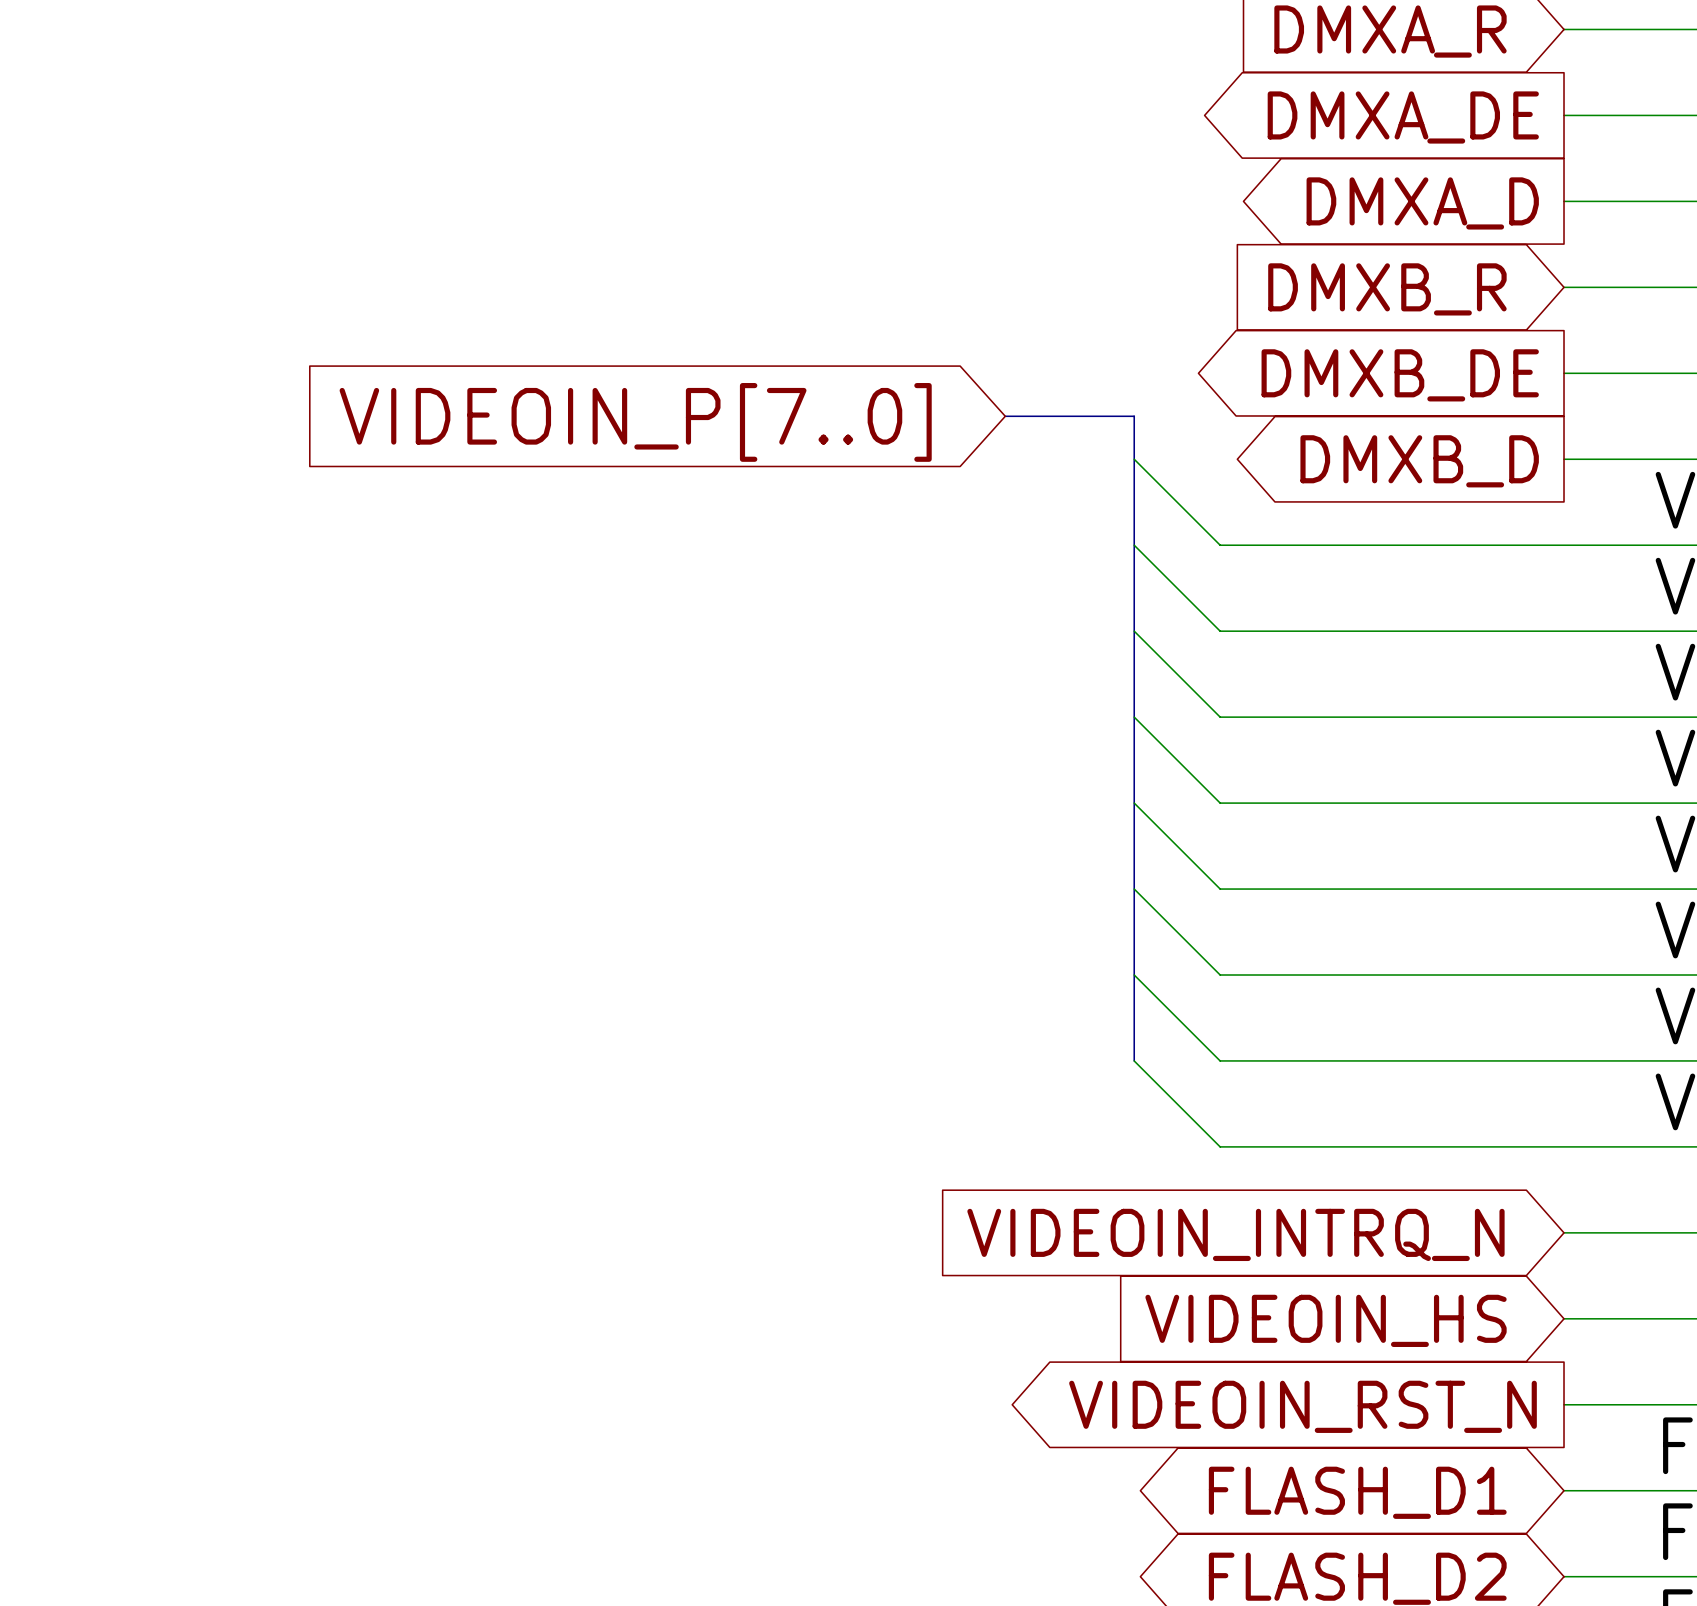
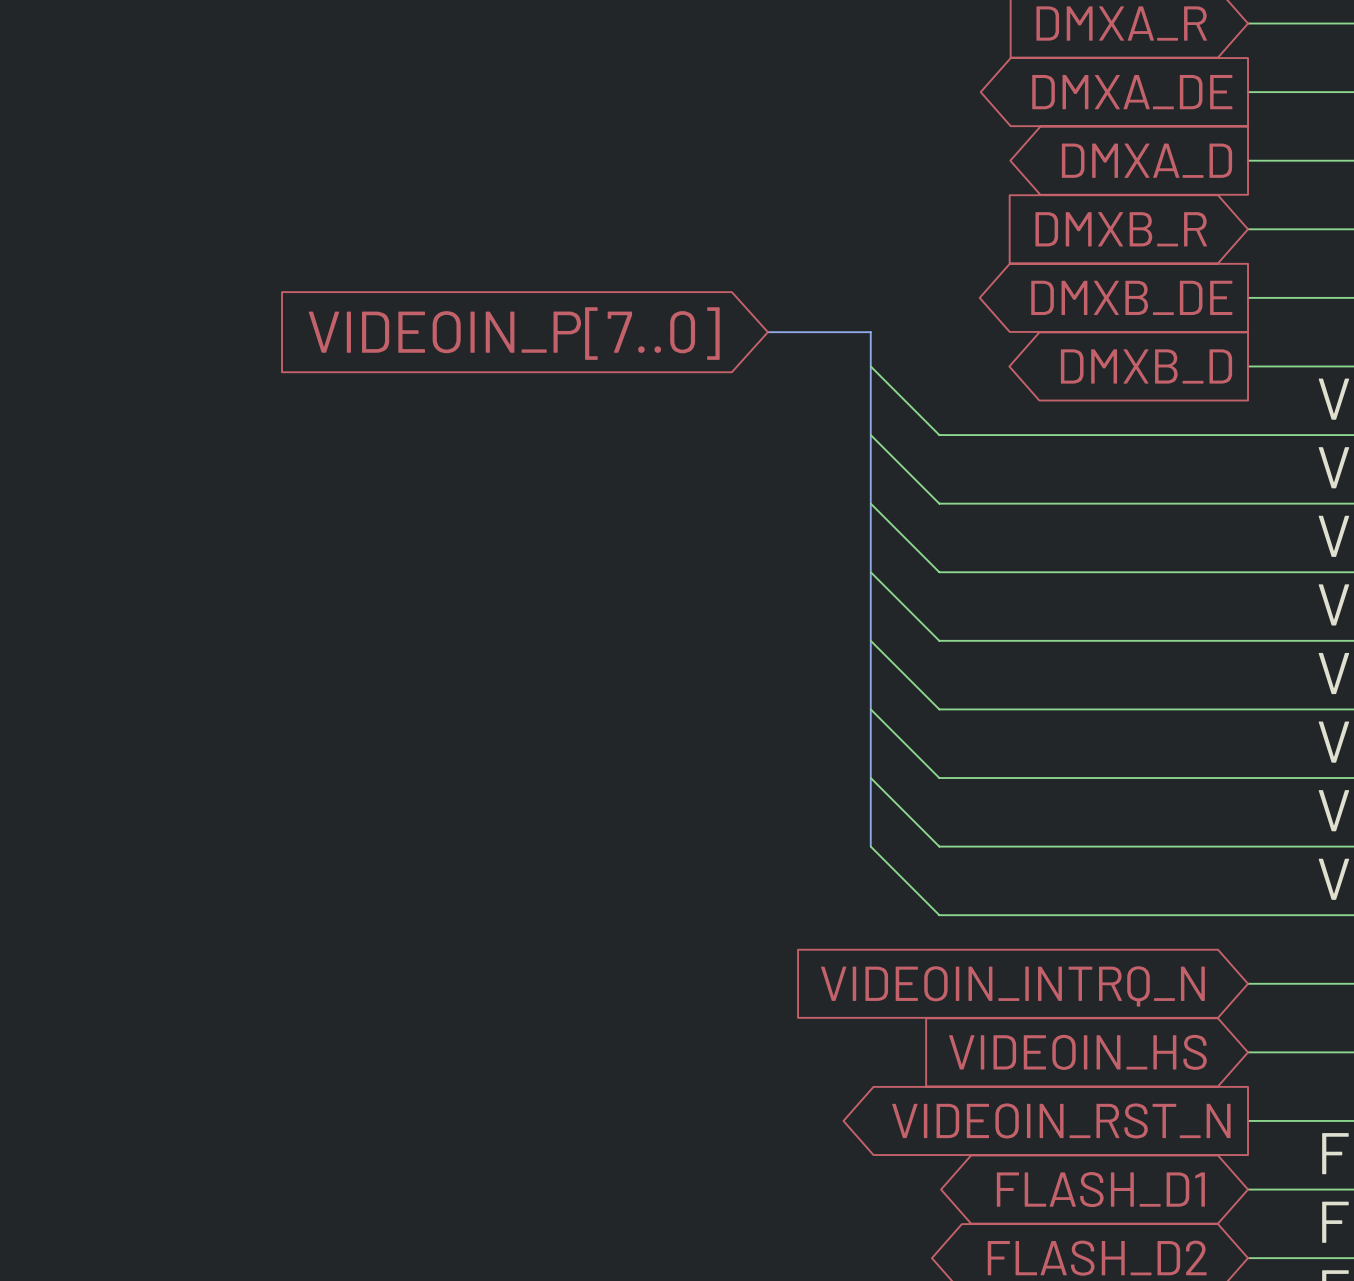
bus: none -> (767, 332) (802, 332)
bus: (1091, 416) (1134, 416) (1134, 1060) -> (870, 332) (870, 846)
global label position: VIDEOIN_P[7..0] (635, 422) -> VIDEOIN_P[7..0] (514, 333)
wire: (1134, 459) (1220, 545) -> (870, 366) (939, 435) (973, 435)
wire: (1134, 545) (1220, 631) -> (870, 435) (939, 503) (973, 503)
wire: (1134, 631) (1220, 717) -> (870, 503) (939, 572) (973, 572)
wire: (1134, 717) (1220, 803) -> (870, 572) (939, 640) (973, 640)
wire: (1134, 803) (1220, 889) -> (870, 640) (939, 709) (973, 709)
wire: (1134, 889) (1220, 975) -> (870, 709) (939, 778) (973, 778)
wire: (1134, 975) (1220, 1060) -> (870, 778) (939, 846) (973, 846)
wire: (1134, 1060) (1220, 1146) -> (870, 846) (939, 915) (973, 915)

